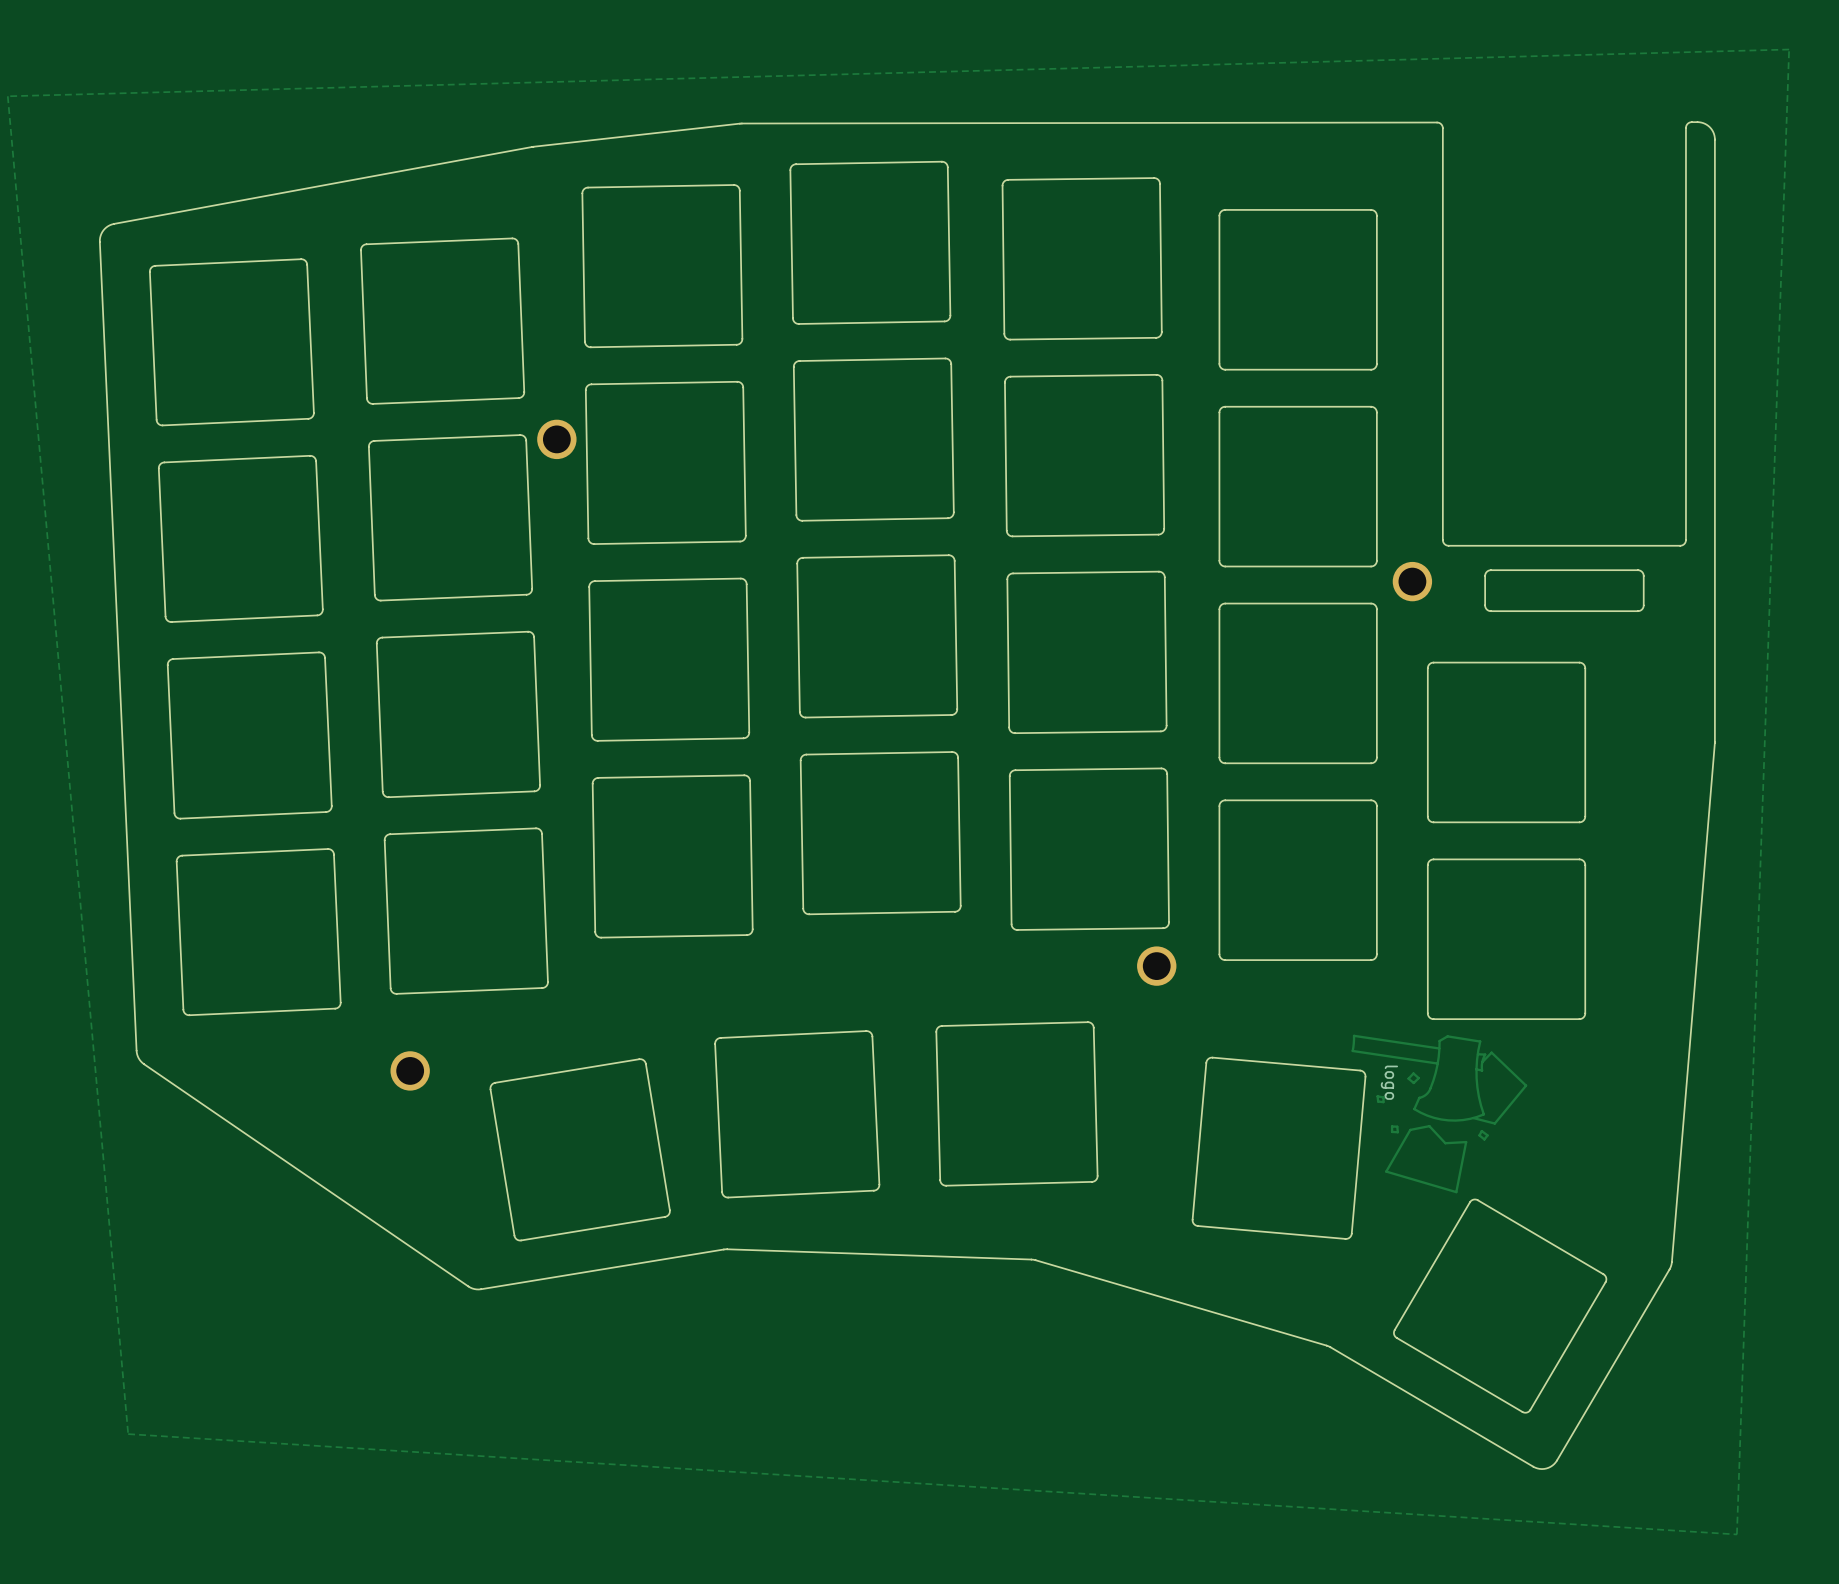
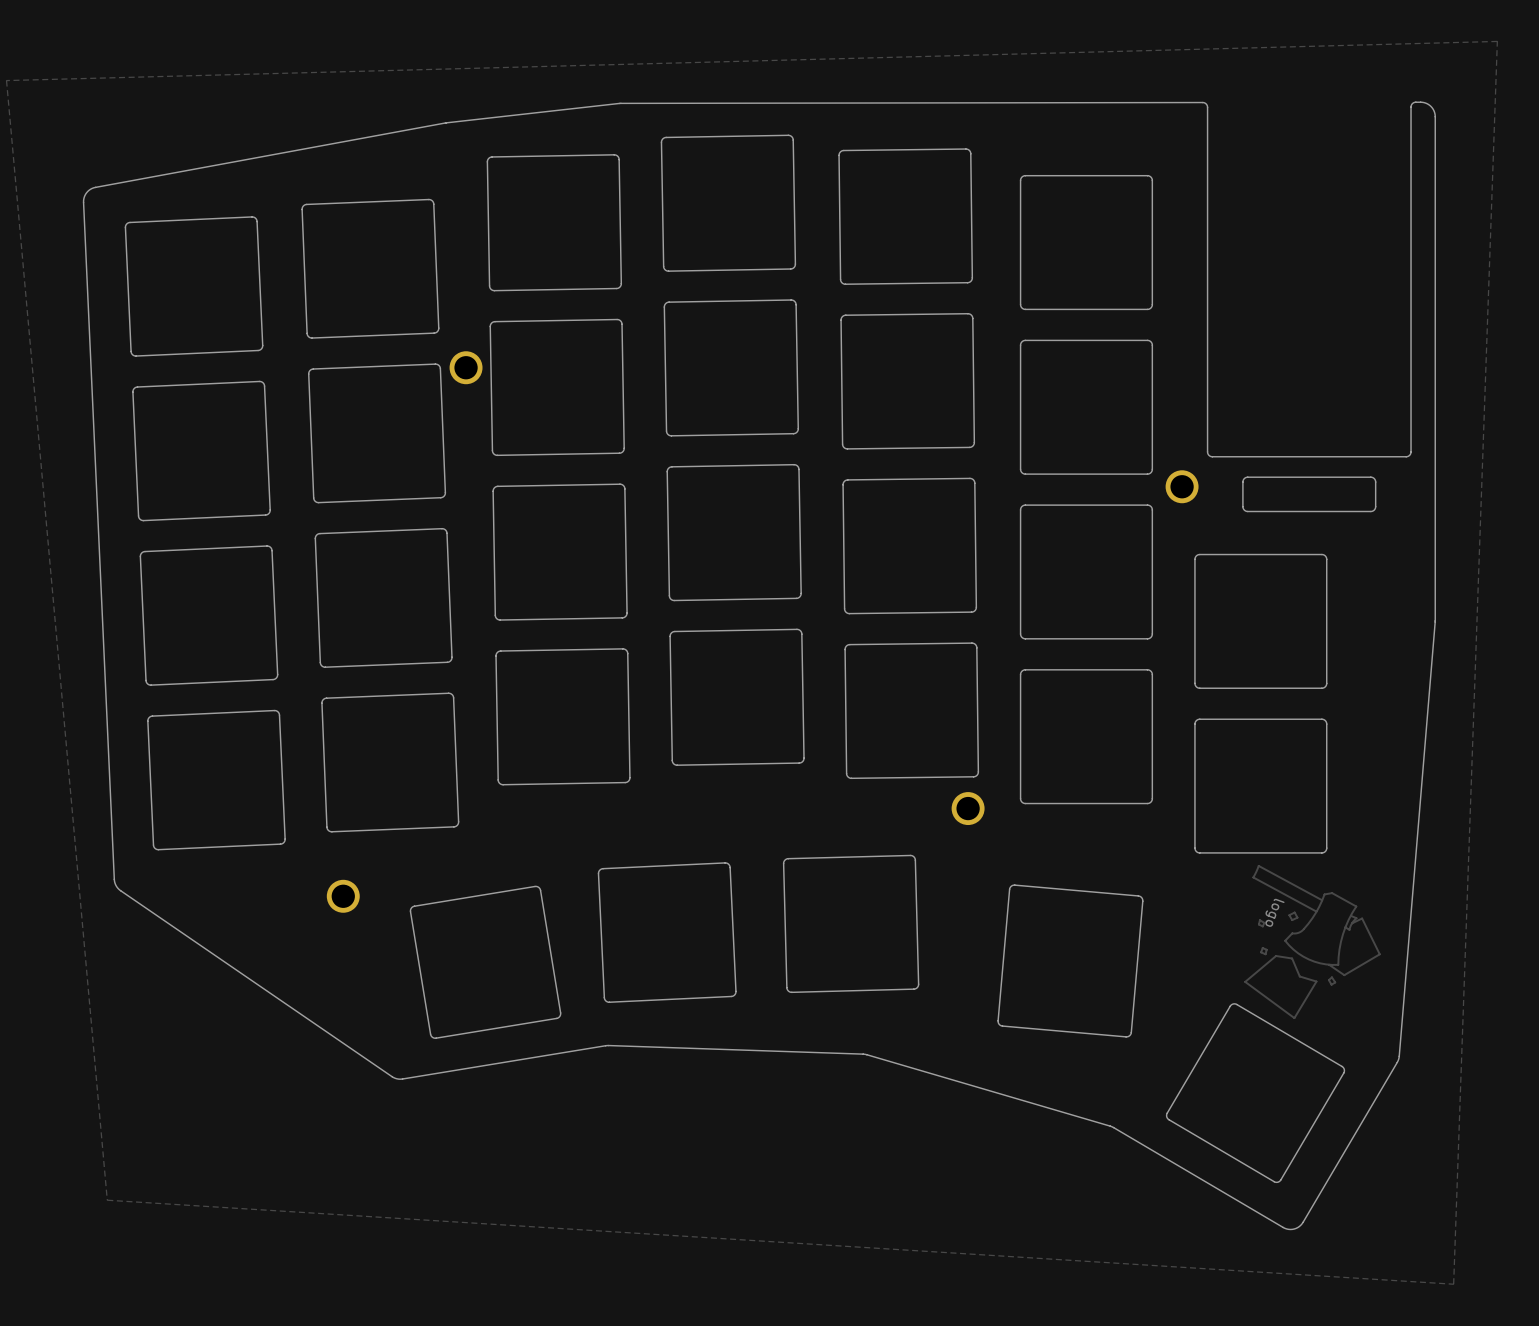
drawing: none -> [1244, 864, 1381, 1020]
drawing: [1351, 1034, 1528, 1194] -> none

